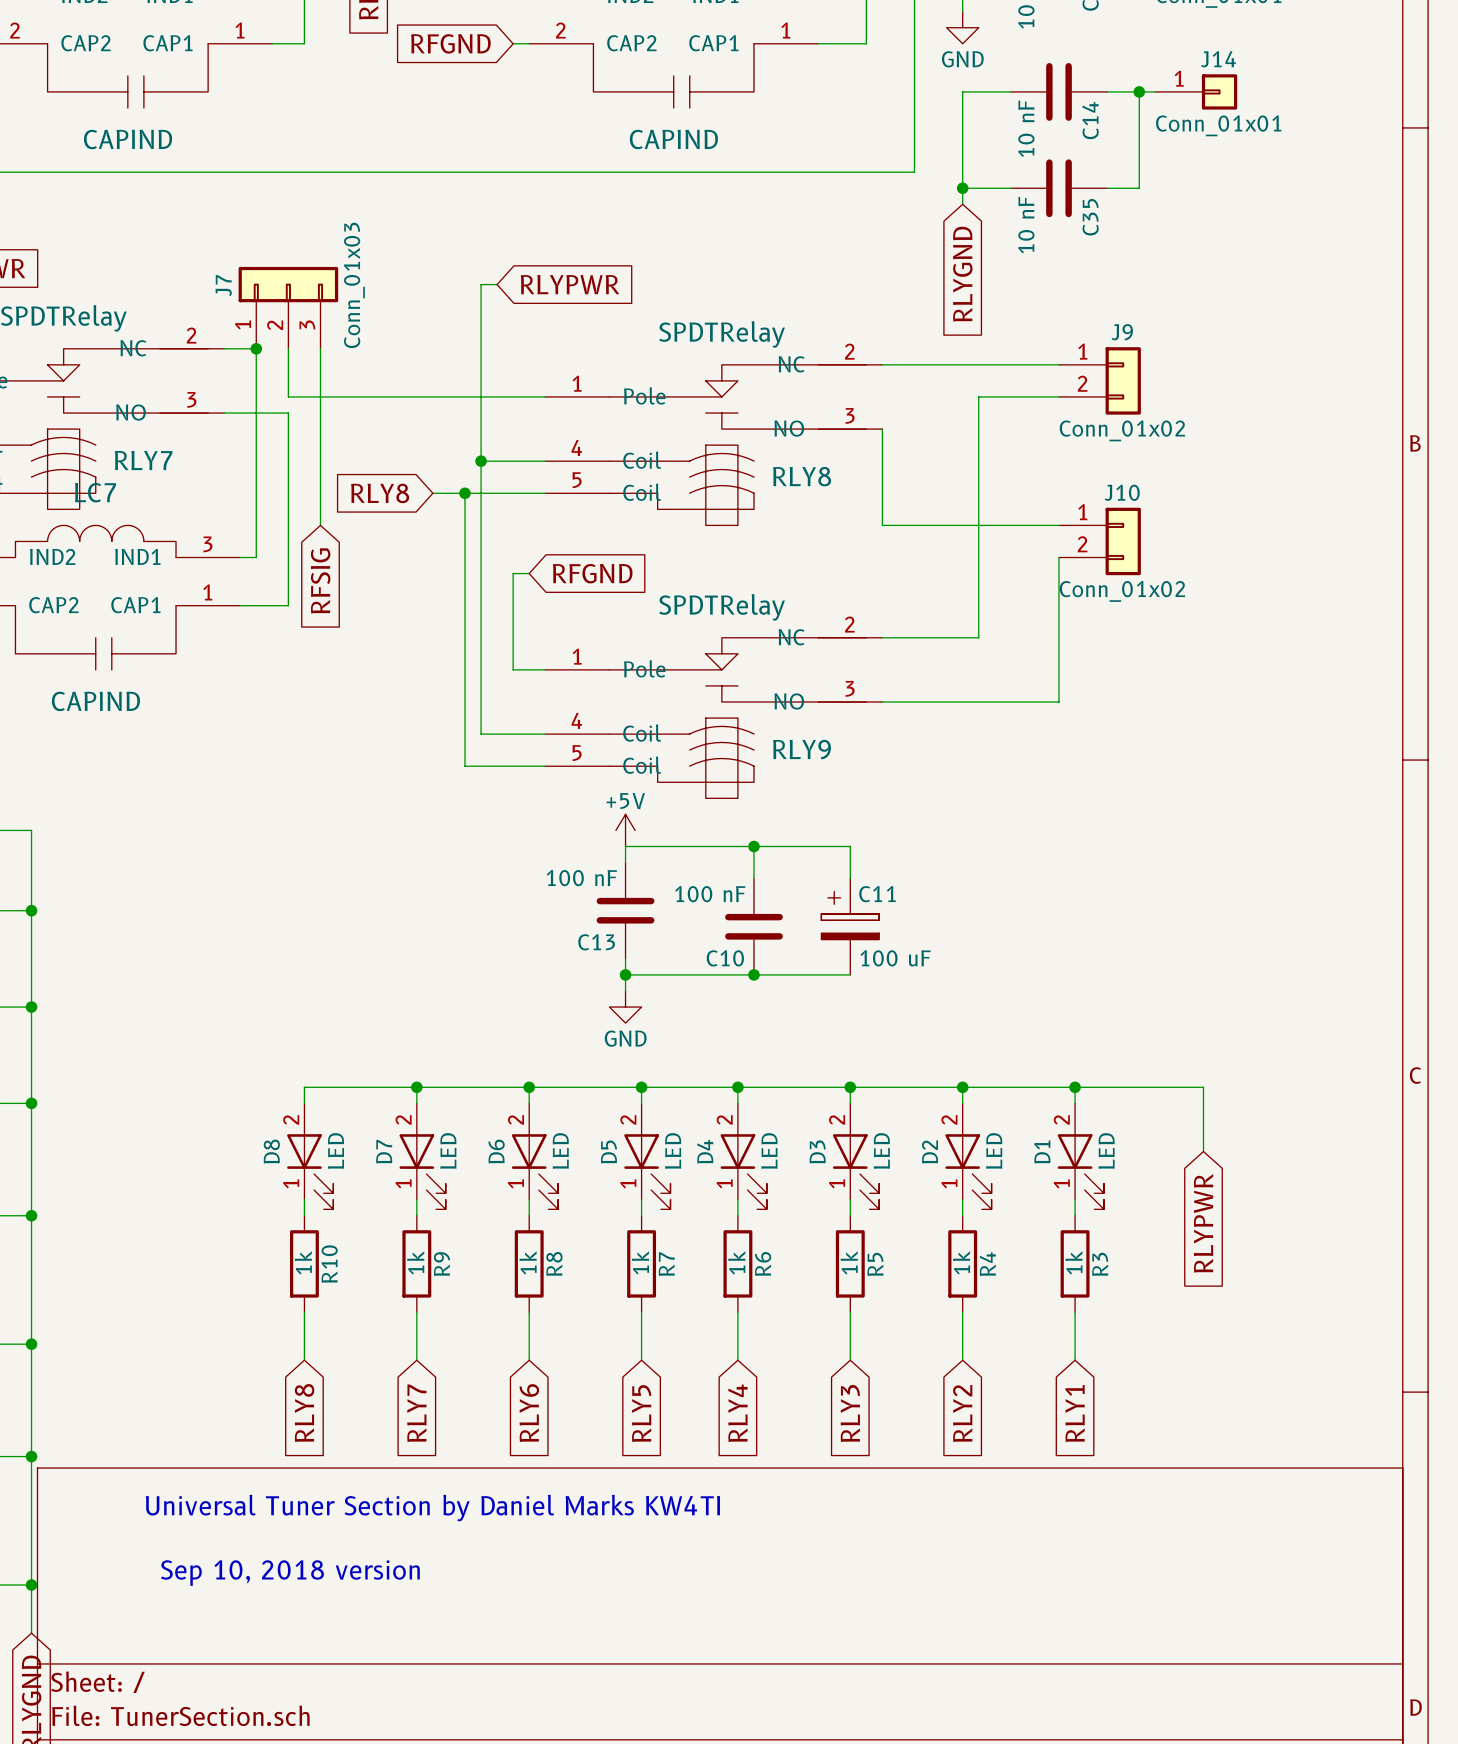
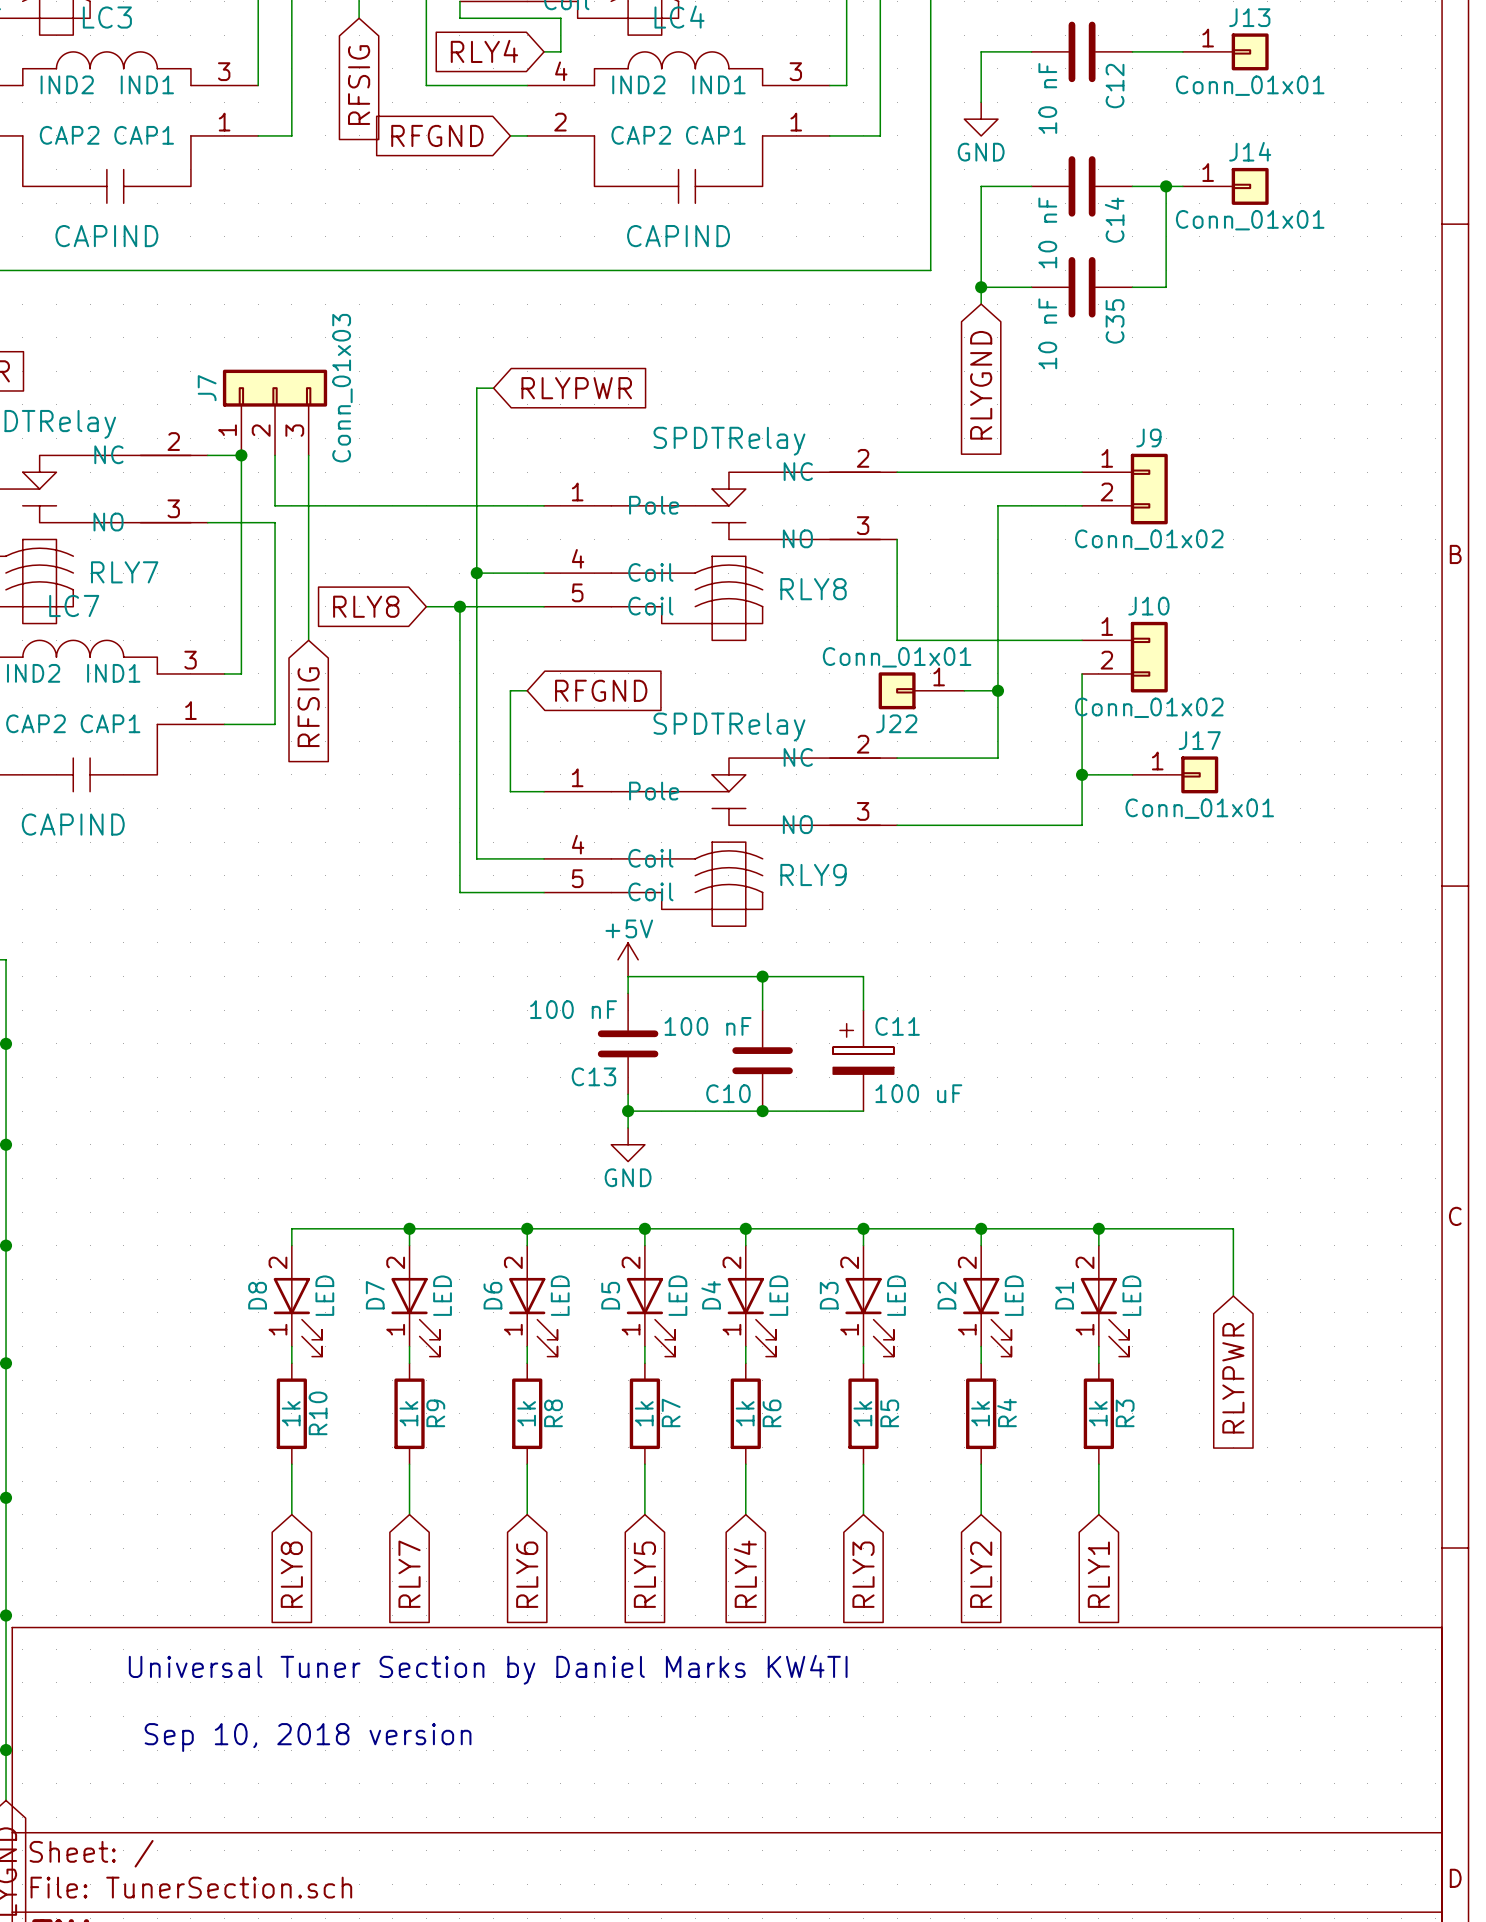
J22: none -> Conn_01x01 (921, 690)
wire: none -> (964, 690) (997, 690)
junction: none -> (997, 690)
wire: none -> (1082, 774) (1132, 774)
junction: none -> (1082, 774)
J17: none -> Conn_01x01 (1175, 774)

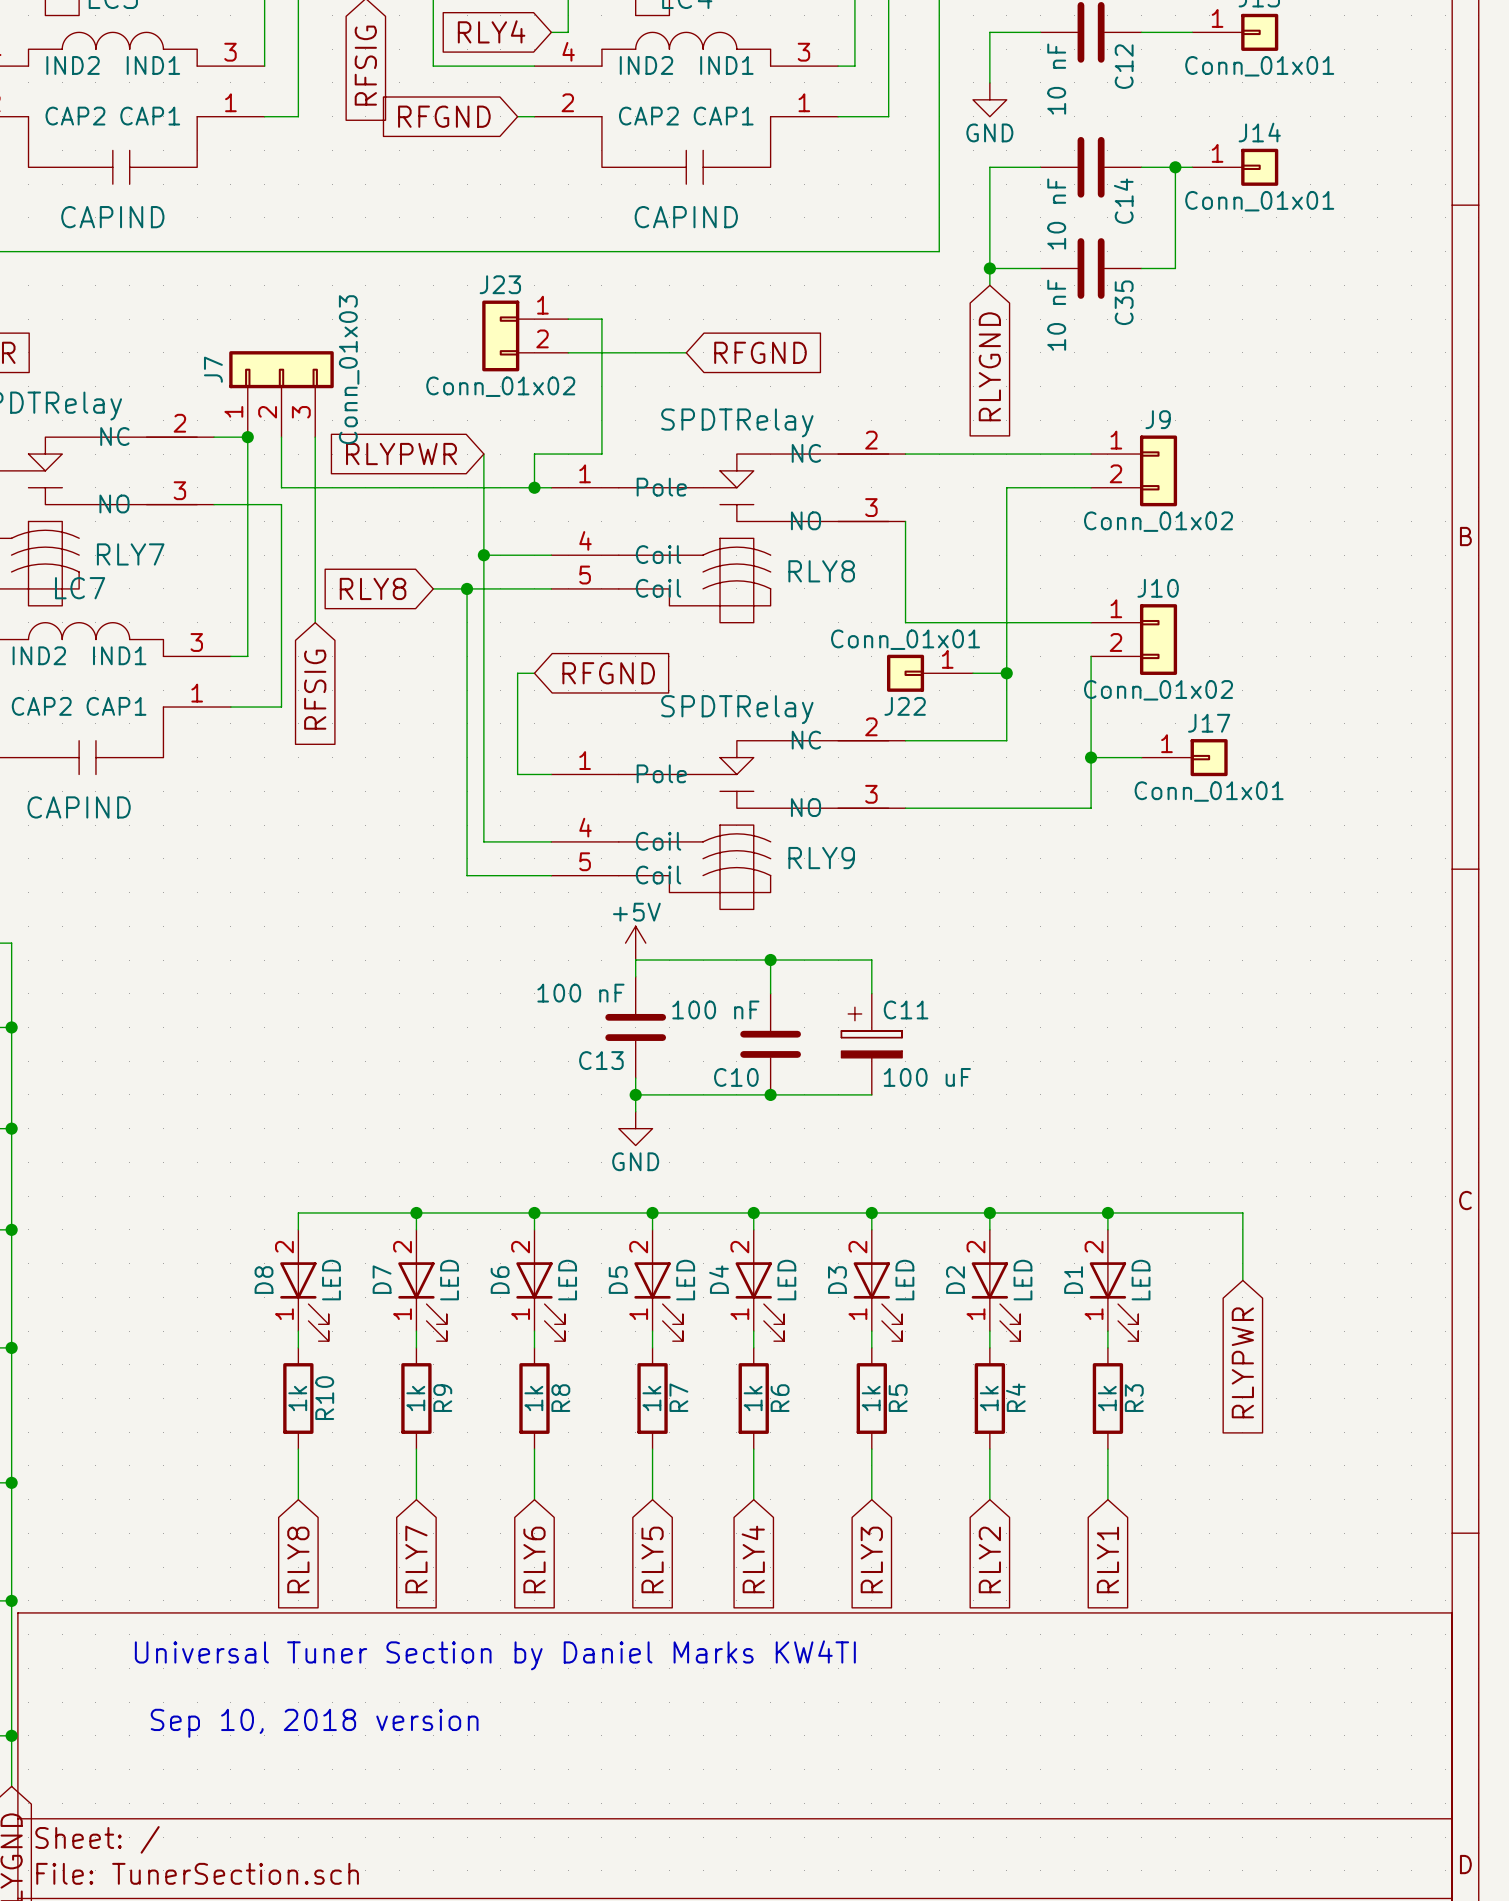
wire: none -> (568, 319) (601, 319) (601, 454) (534, 454) (534, 487)
J23: none -> Conn_01x02 (525, 335)
wire: none -> (568, 352) (686, 352)
global label: none -> RFGND (760, 352)
wire: (493, 388) (476, 388) (476, 472) -> none
global label rotation: 0° (576, 388) -> 180° (401, 454)
global label position: RLYPWR (576, 388) -> RLYPWR (401, 454)
junction: none -> (534, 487)

